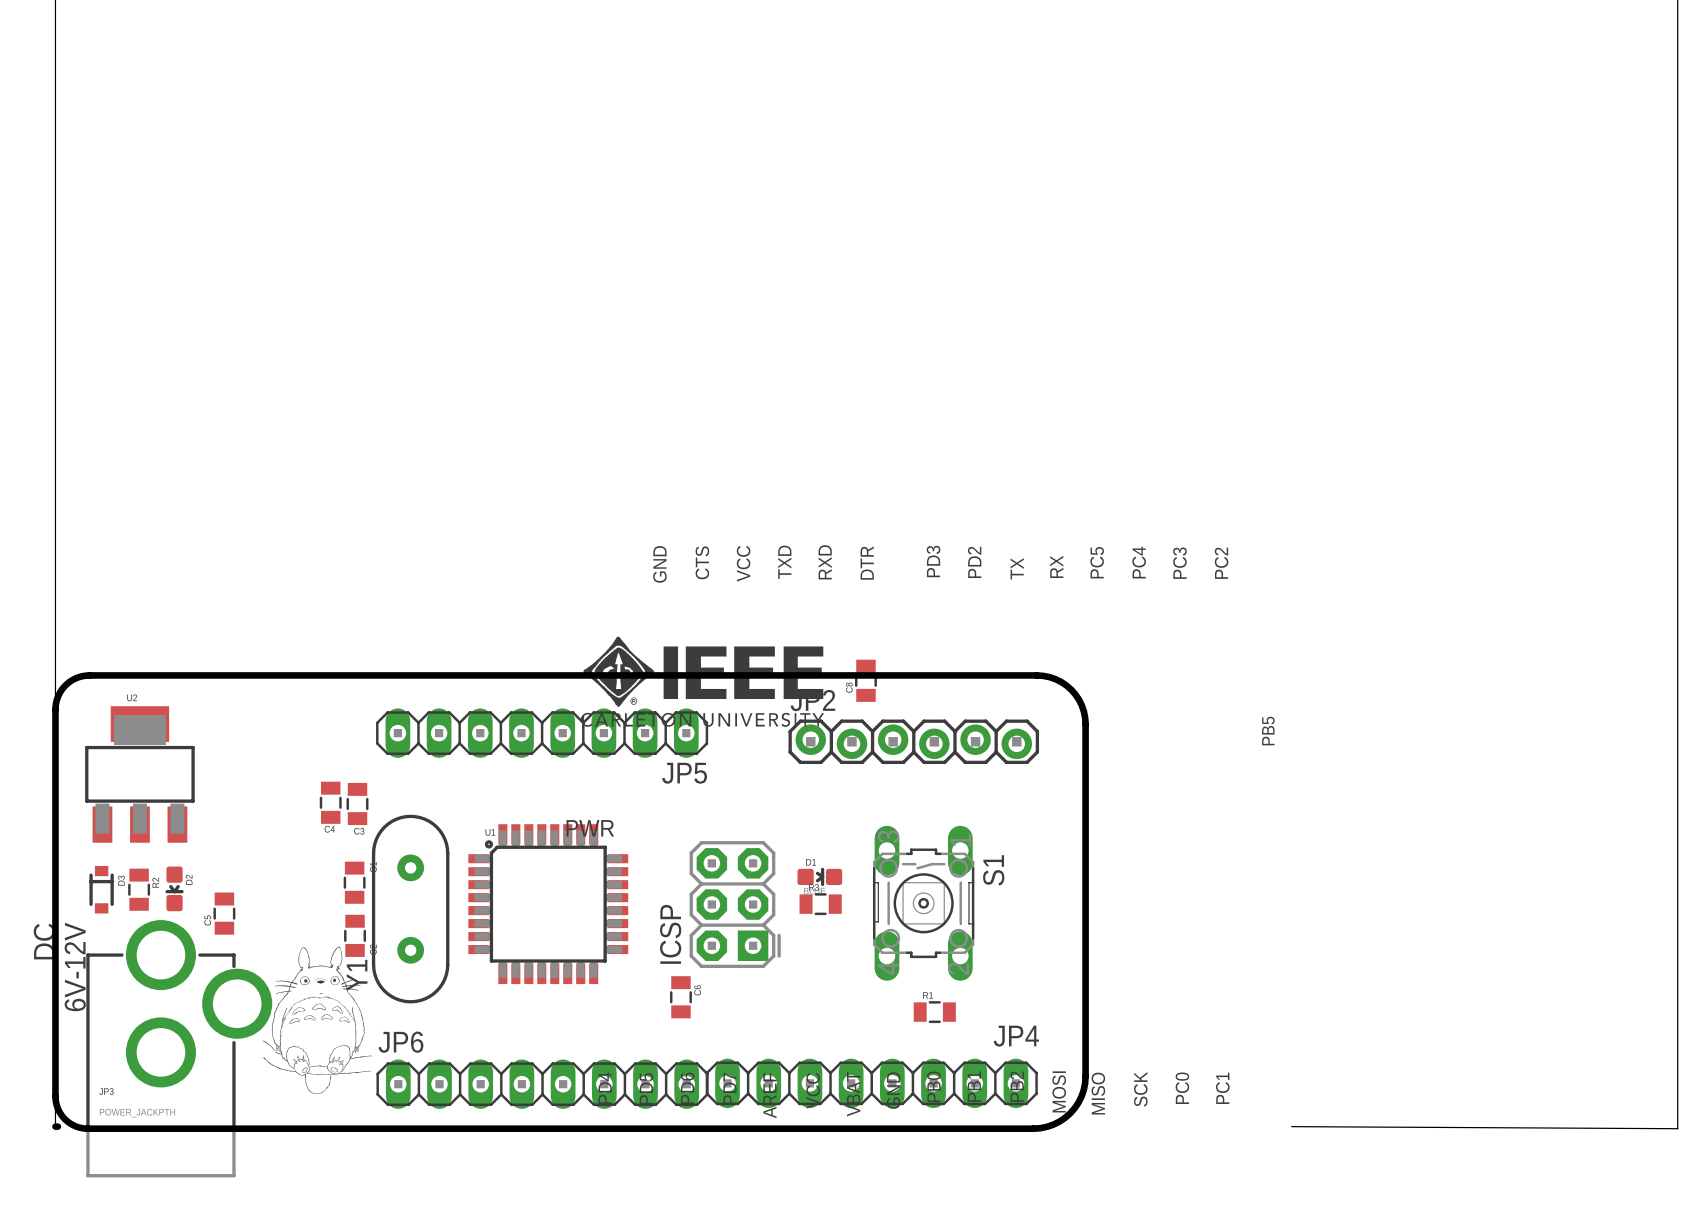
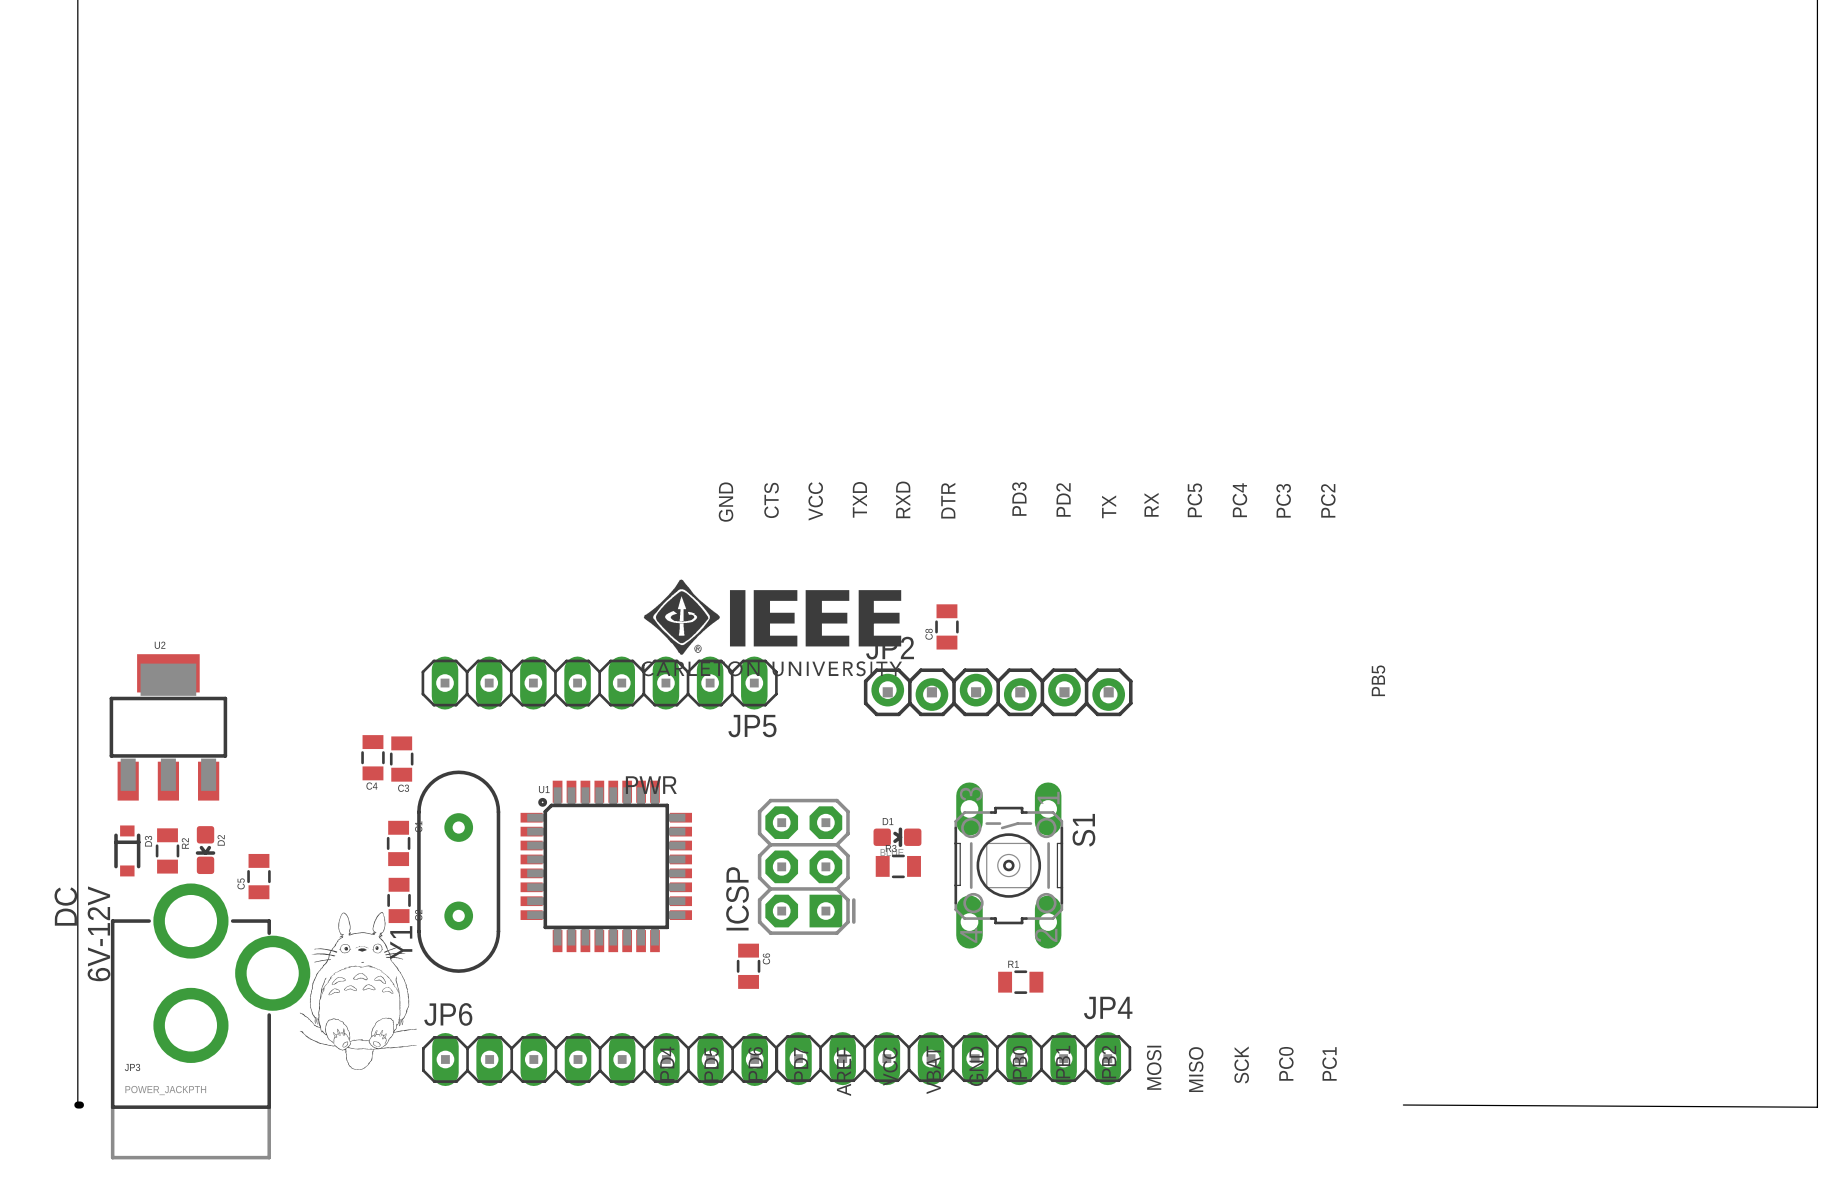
board edge: (89, 675) (1036, 675) (1055, 679) (1066, 685) (1075, 694) (1081, 705) (1085, 724) (1085, 1076) (1081, 1096) (1070, 1113) (1059, 1121) (1046, 1126) (1033, 1128) (87, 1128) (75, 1126) (62, 1116) (56, 1104) (55, 1096) (55, 709) (58, 696) (65, 685) (76, 678) (89, 675) -> none

